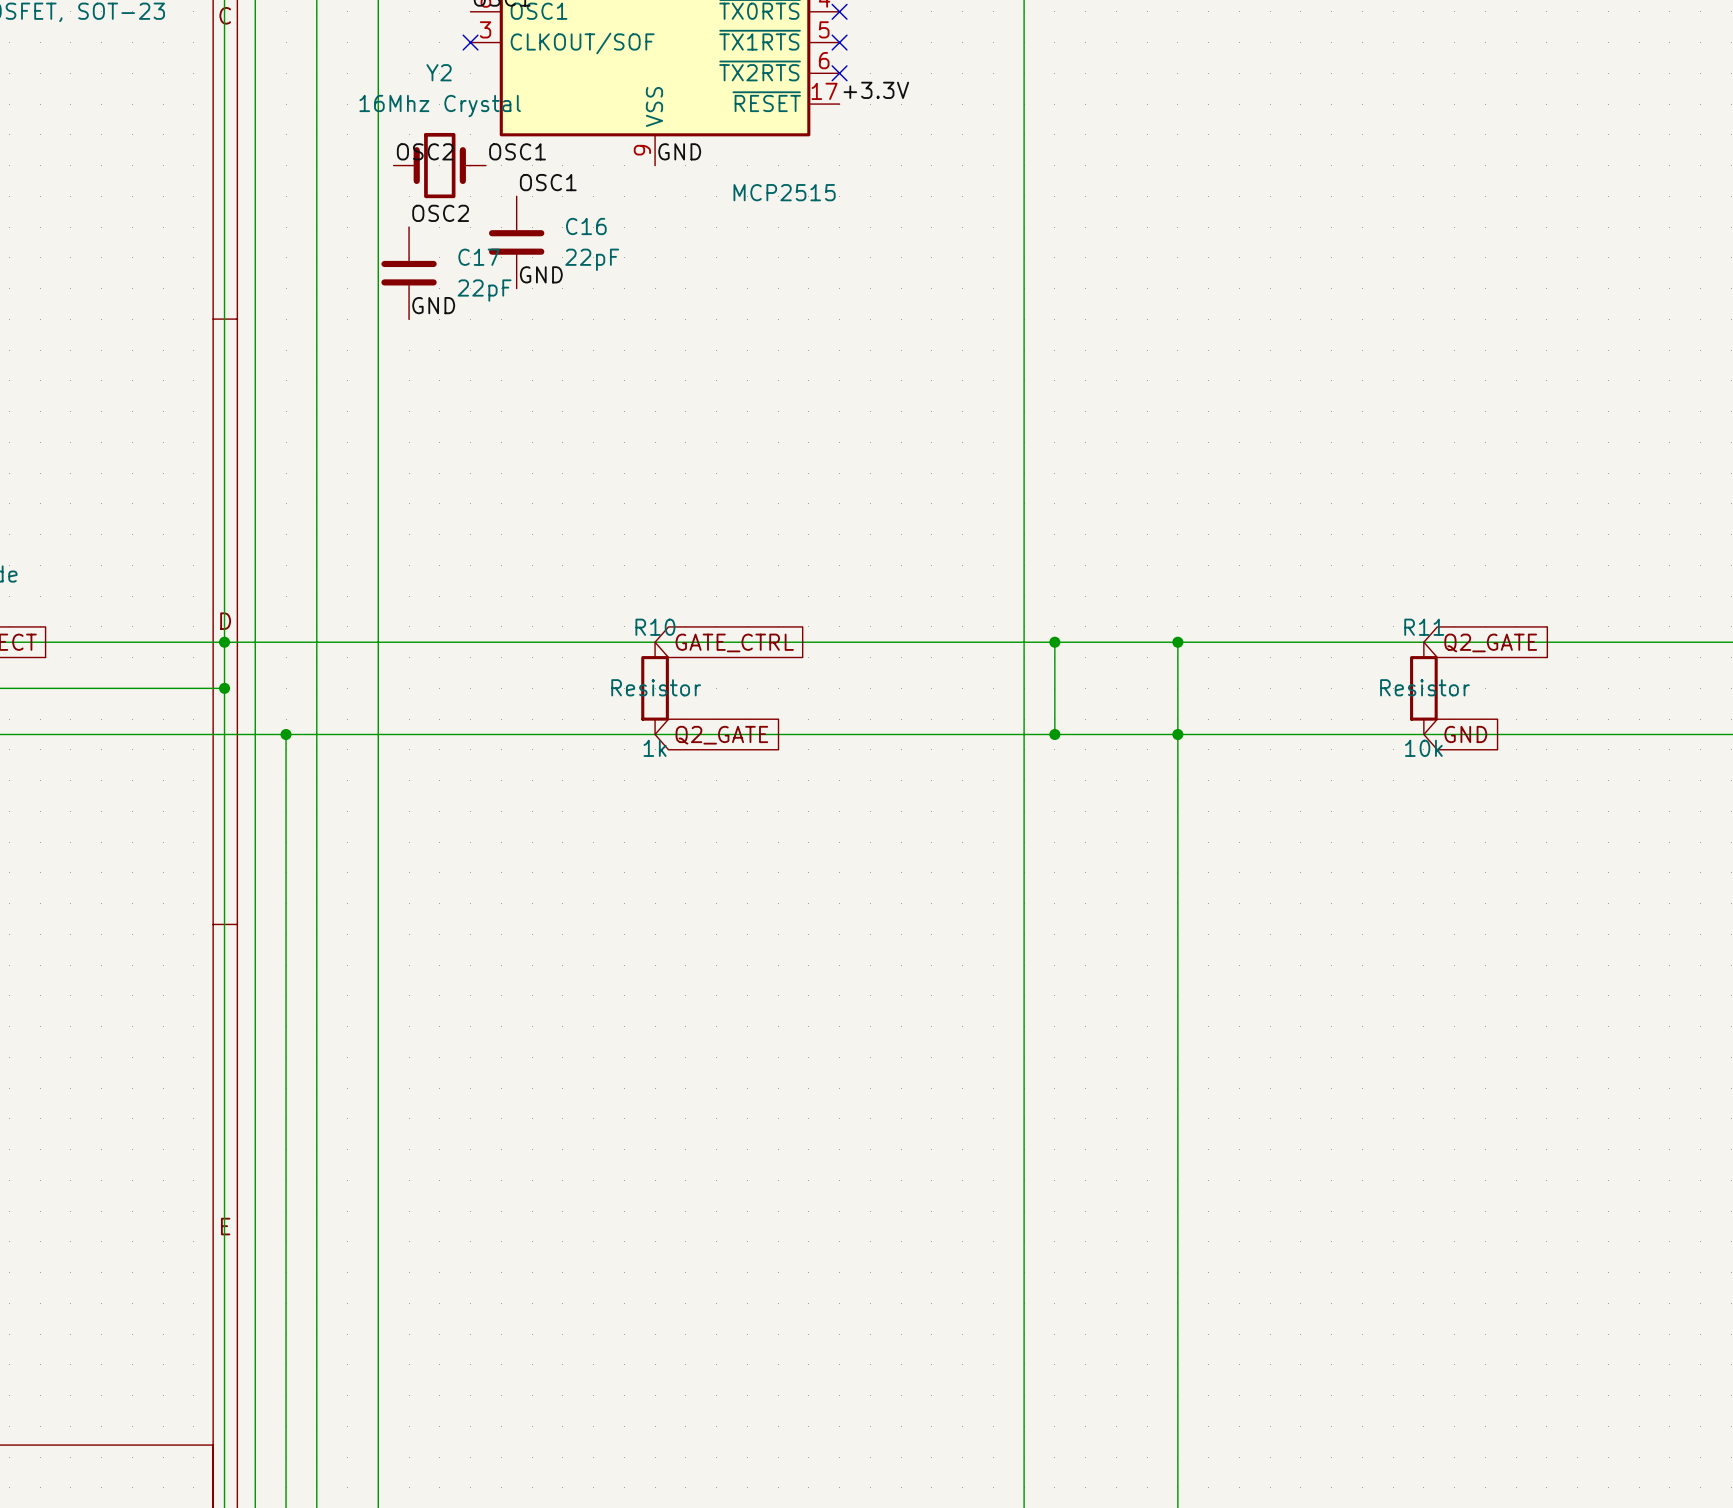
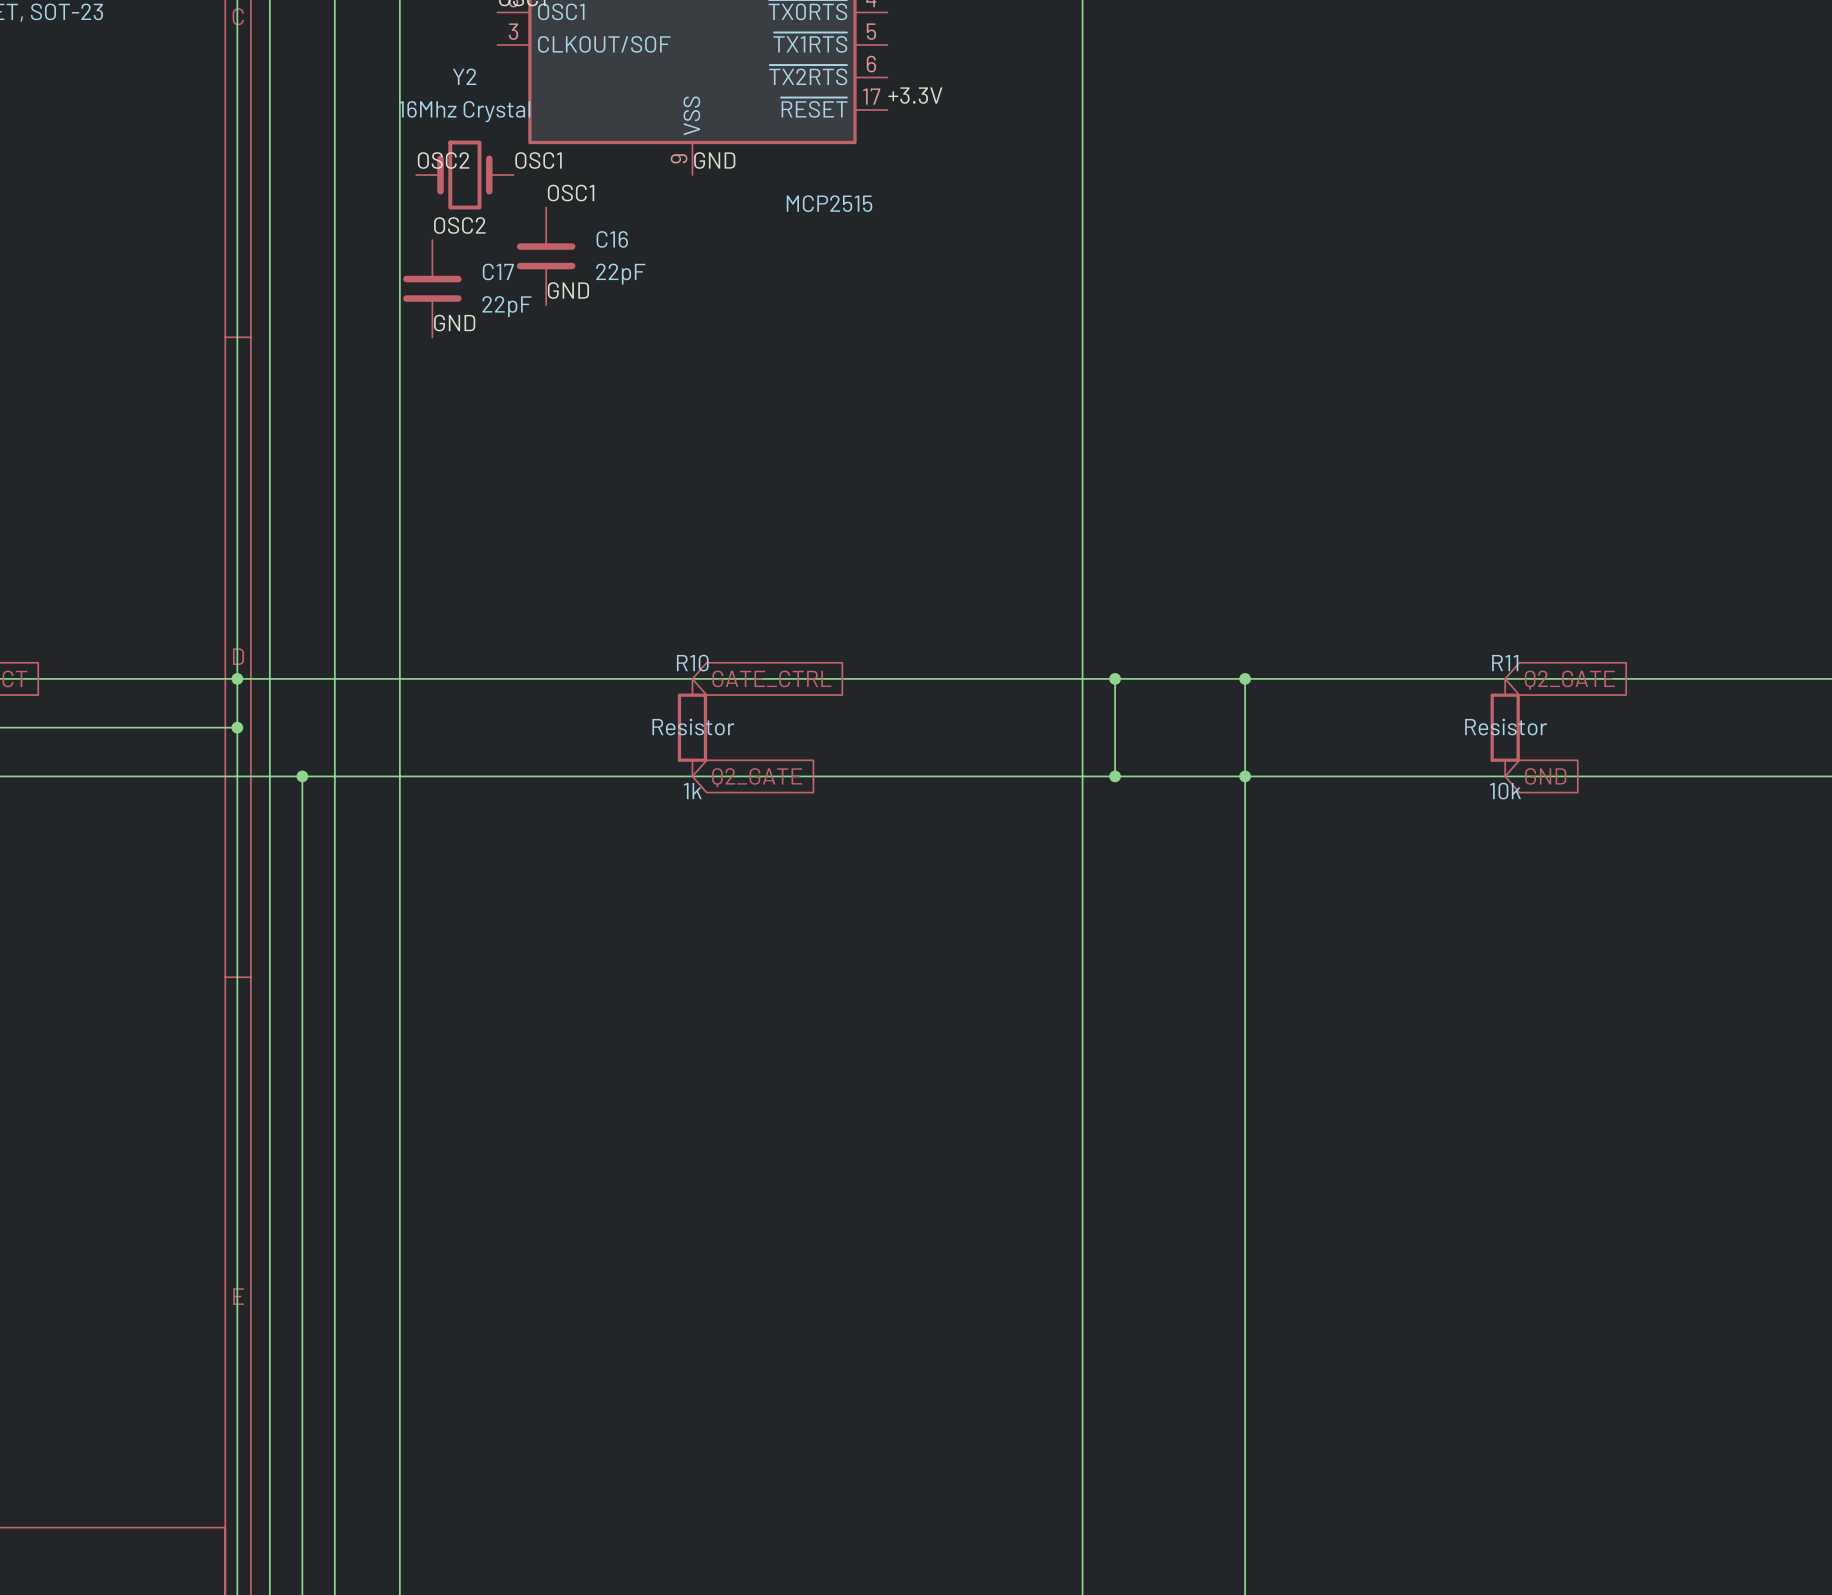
no-connect mark: (839, 11) -> none
no-connect mark: (470, 42) -> none
no-connect mark: (839, 42) -> none
no-connect mark: (839, 73) -> none

